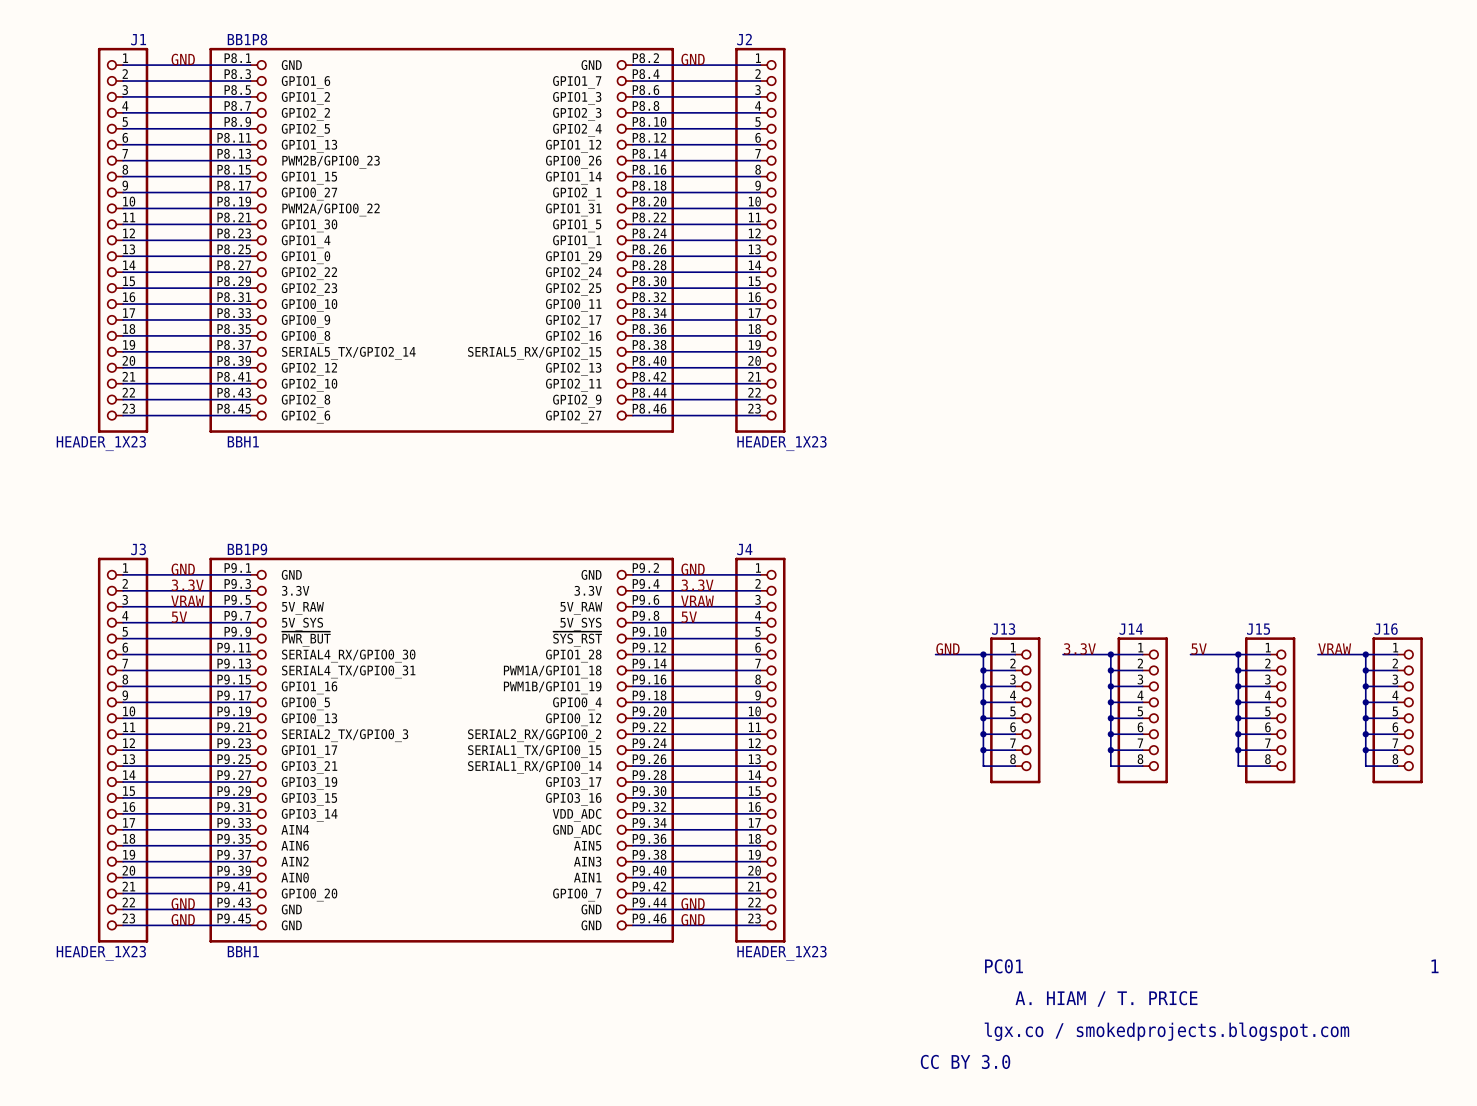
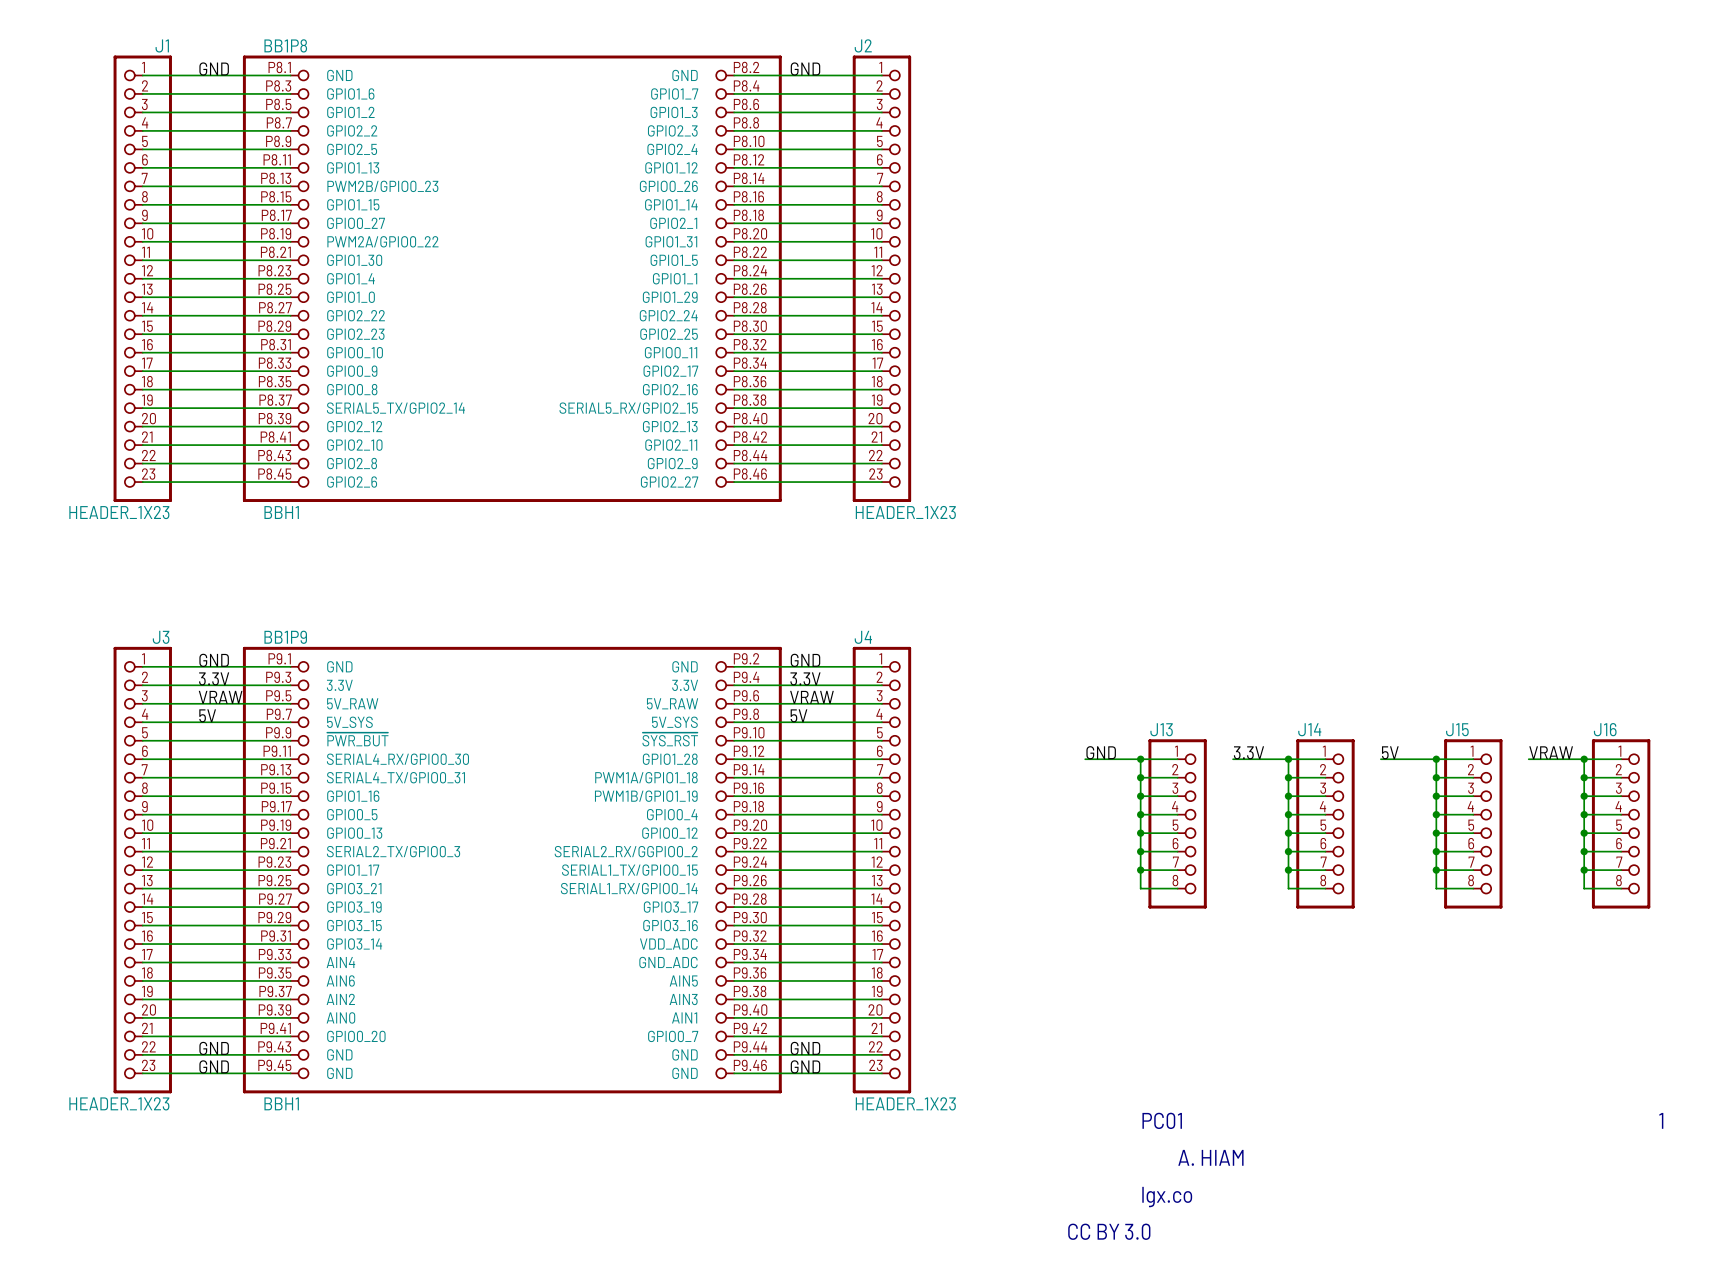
text: A. HIAM / T. PRICE (1106, 998) -> A. HIAM (1210, 1157)
text: lgx.co / smokedprojects.blogspot.com (1166, 1031) -> lgx.co (1167, 1197)

